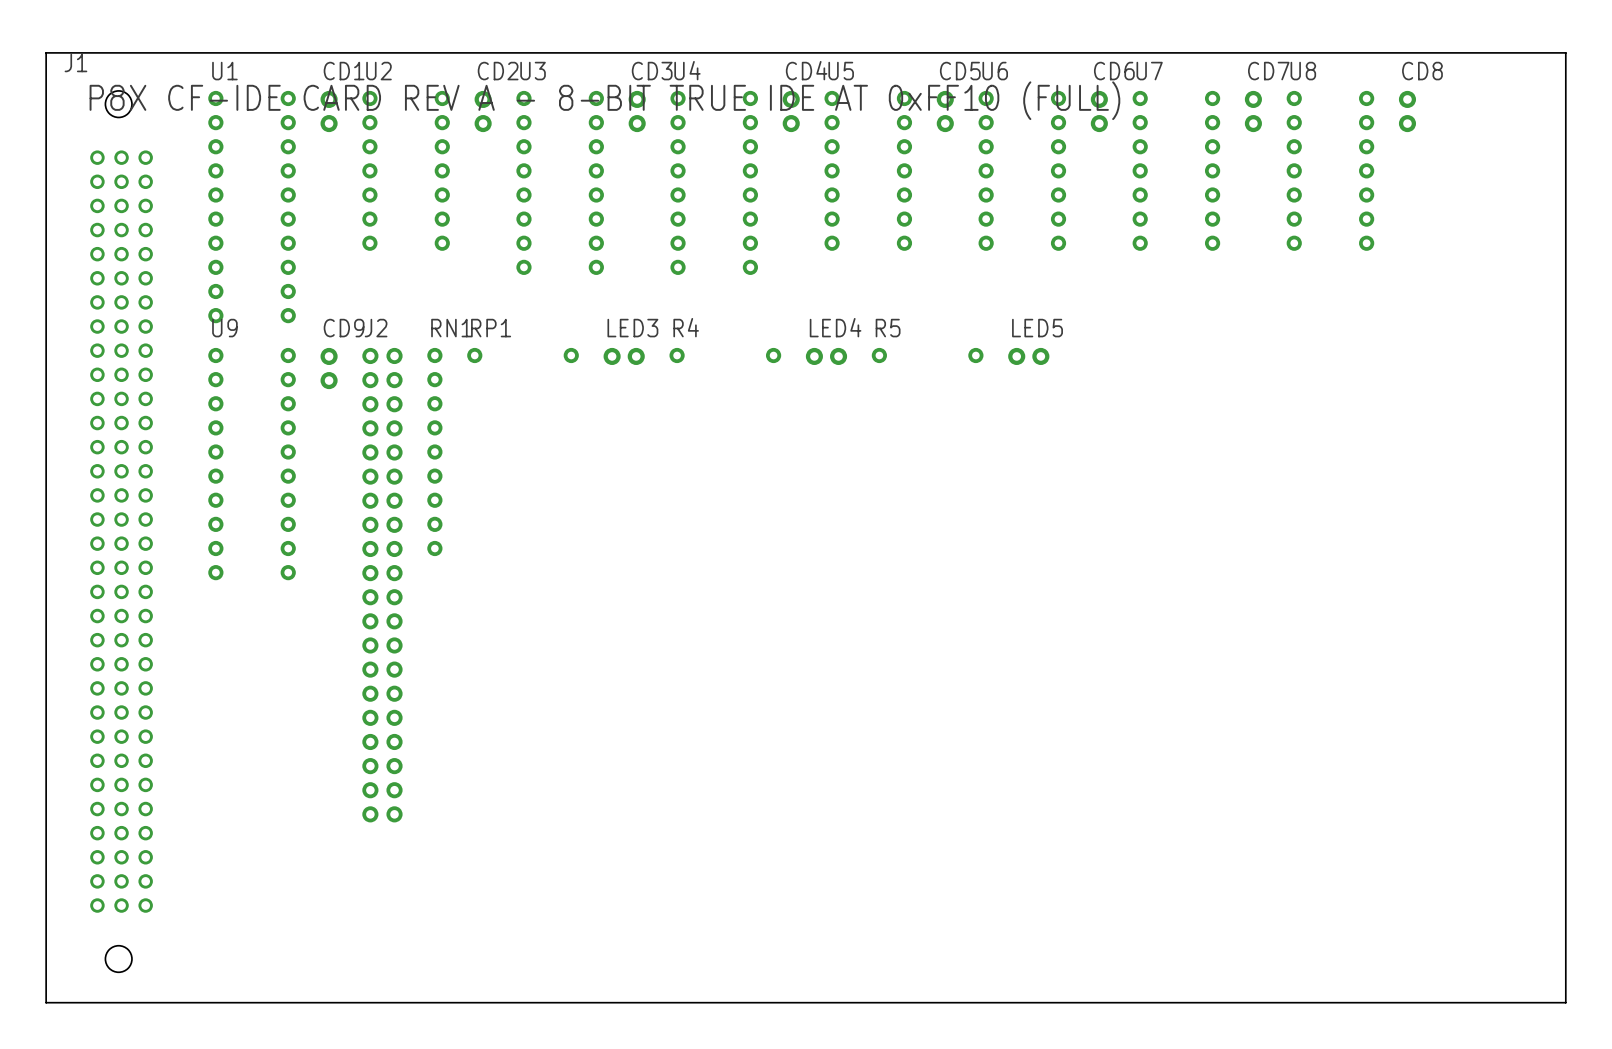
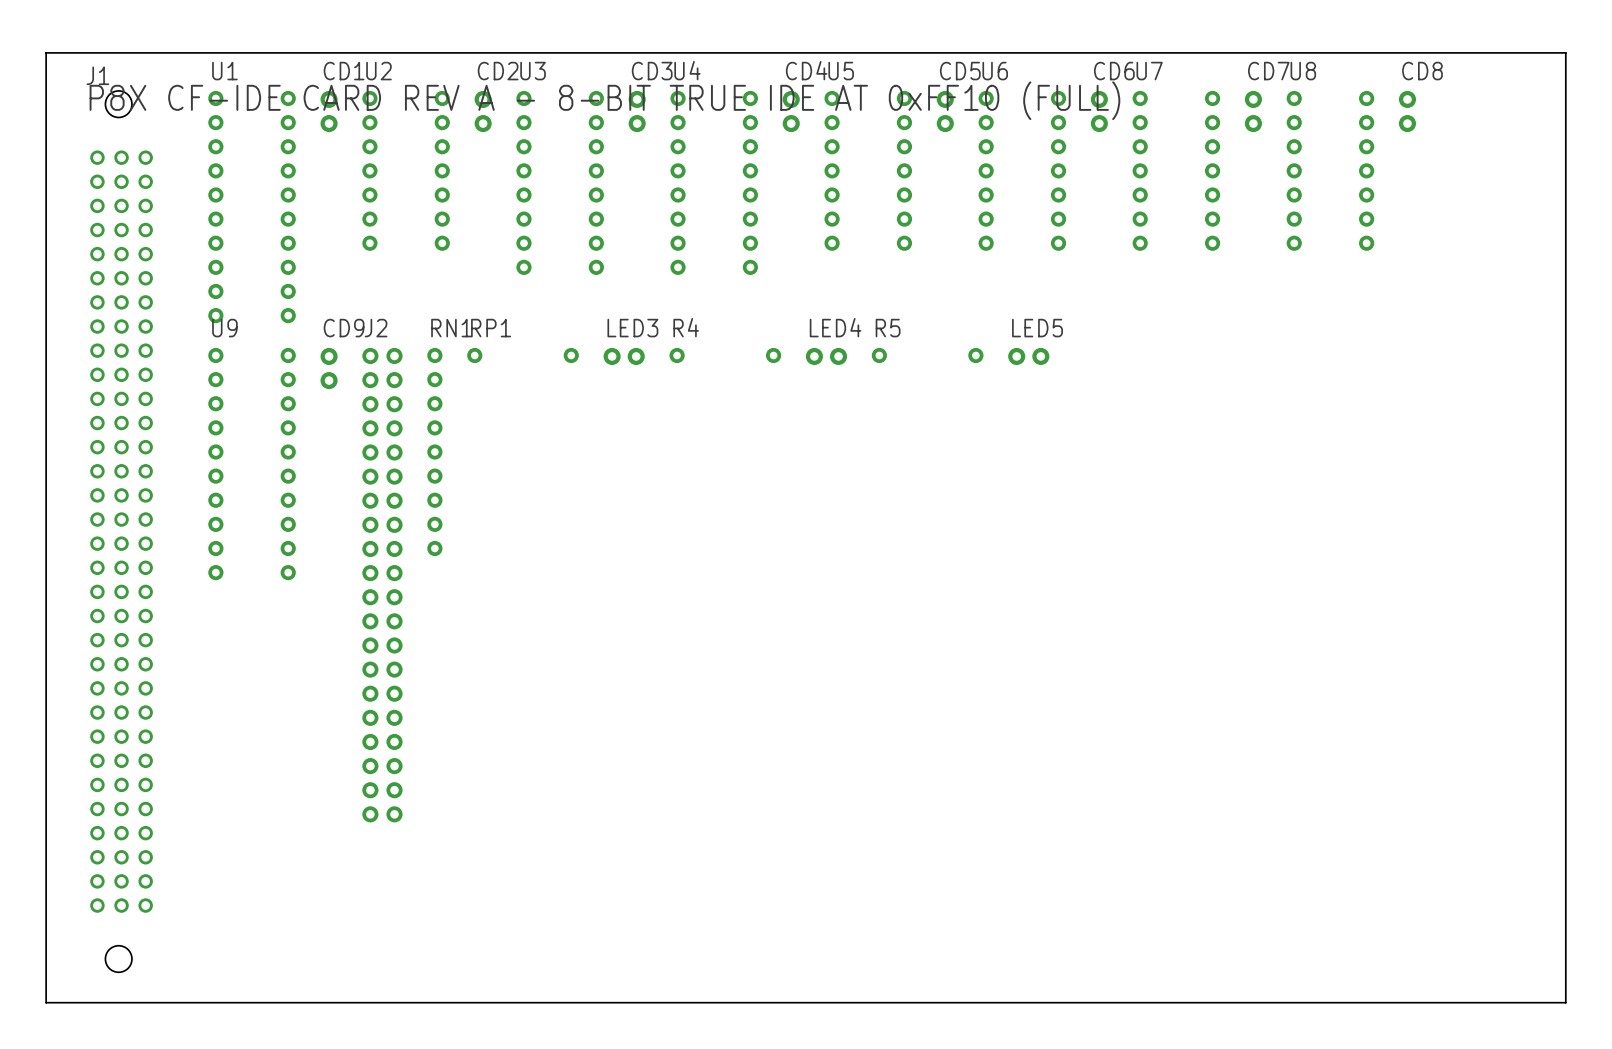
J1 name position: J1 (75, 62) -> J1 (97, 75)

